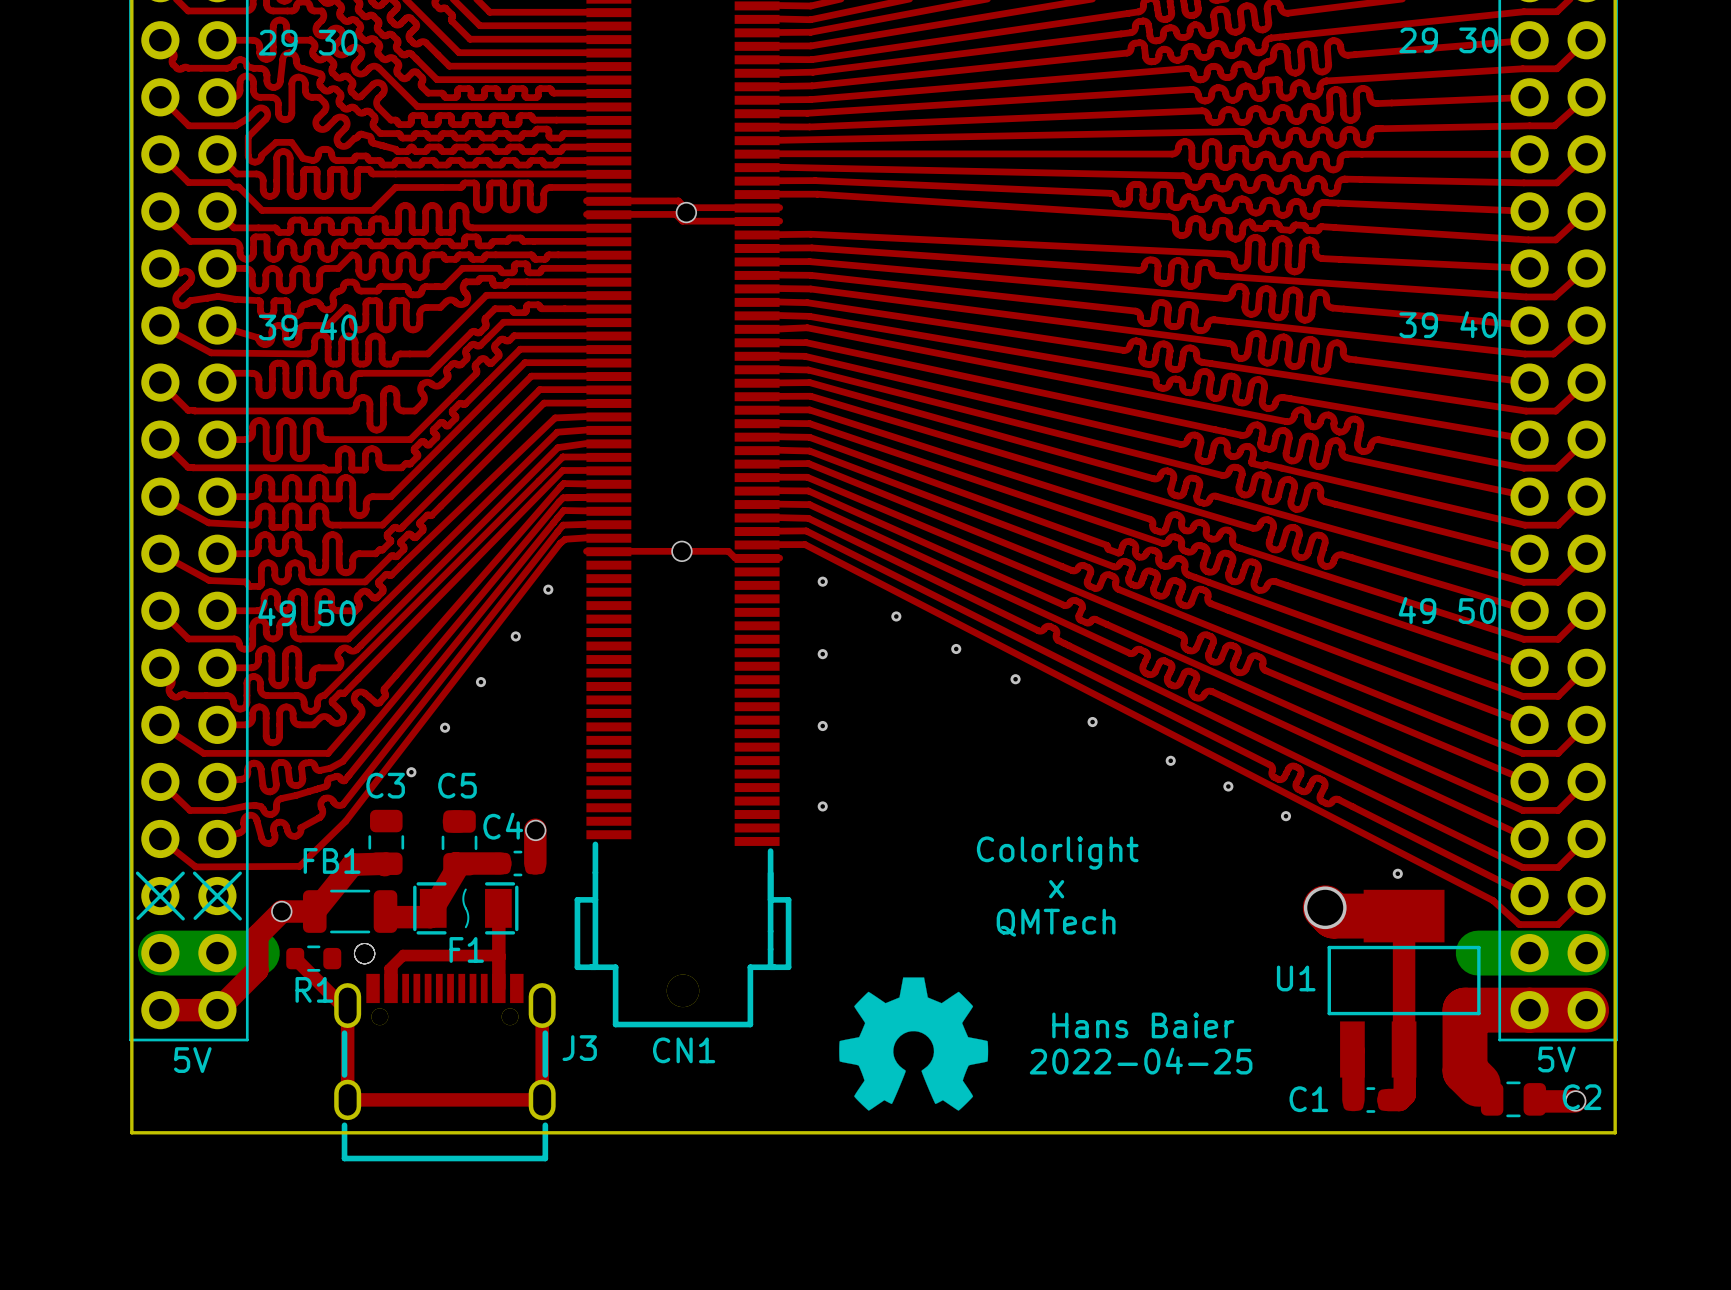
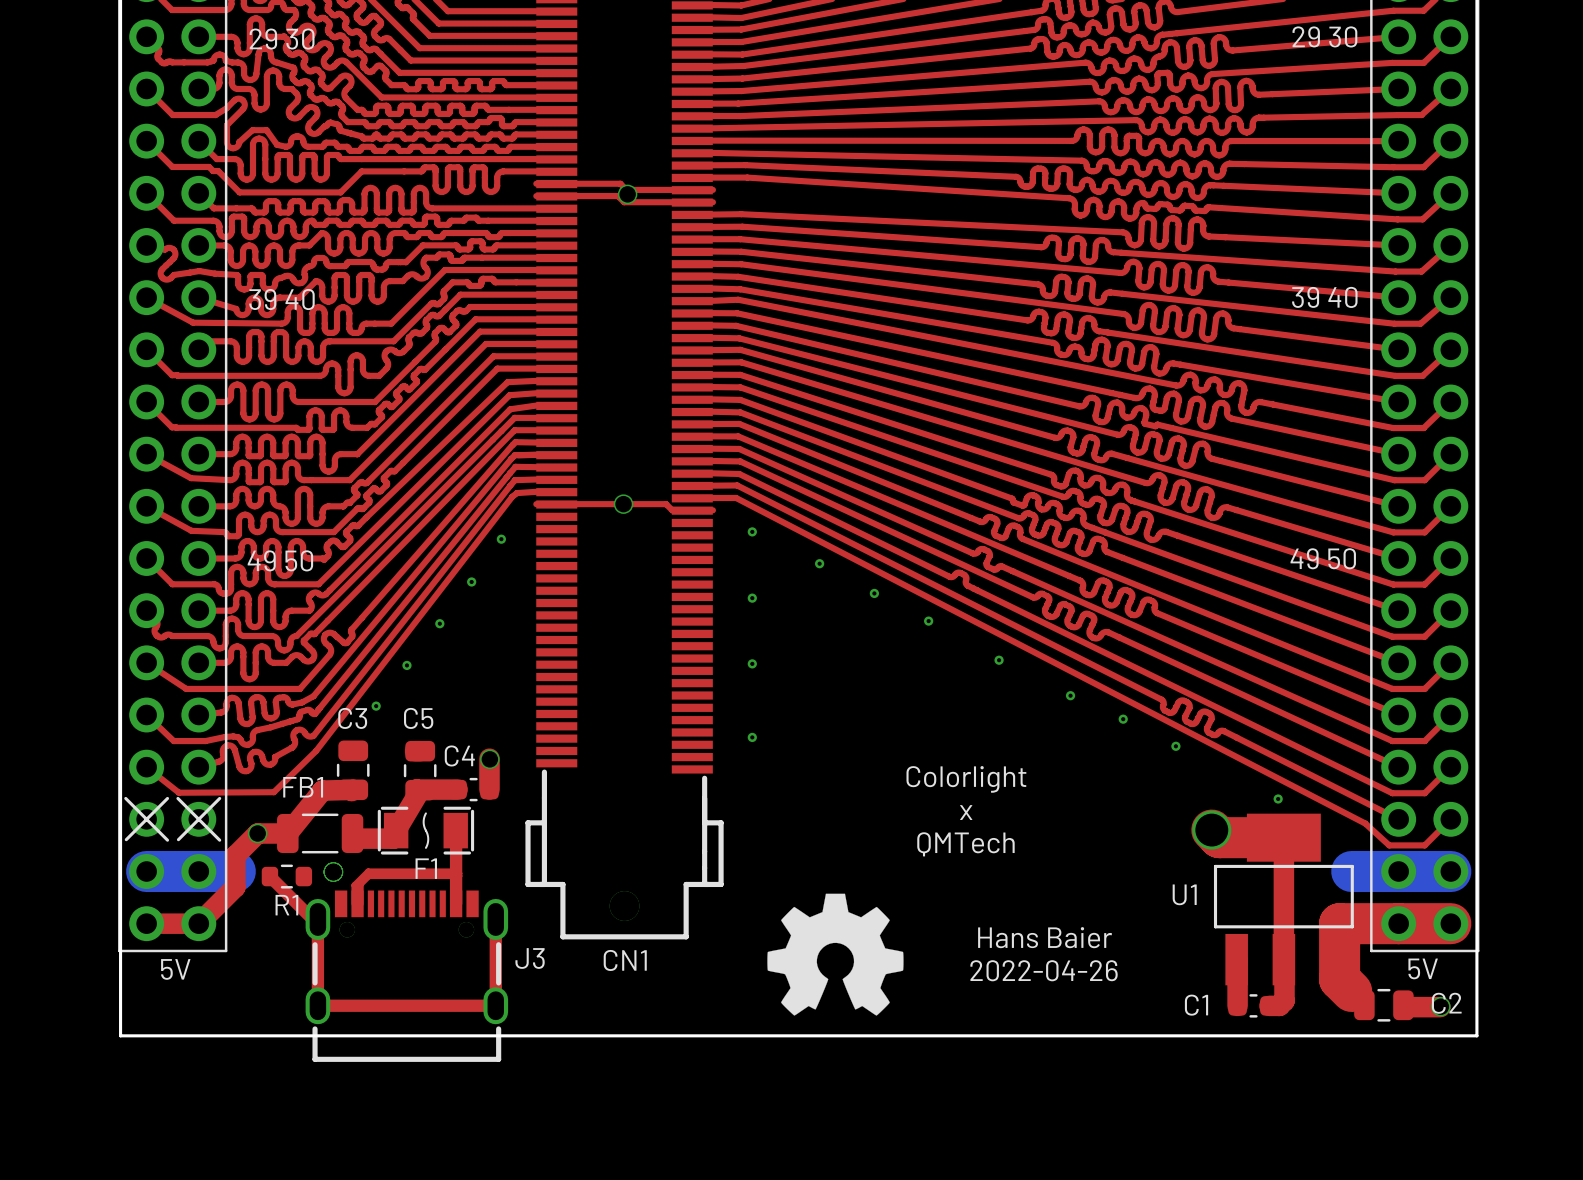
text: 2022-04-25 (1141, 1061) -> 2022-04-26 (1044, 970)

